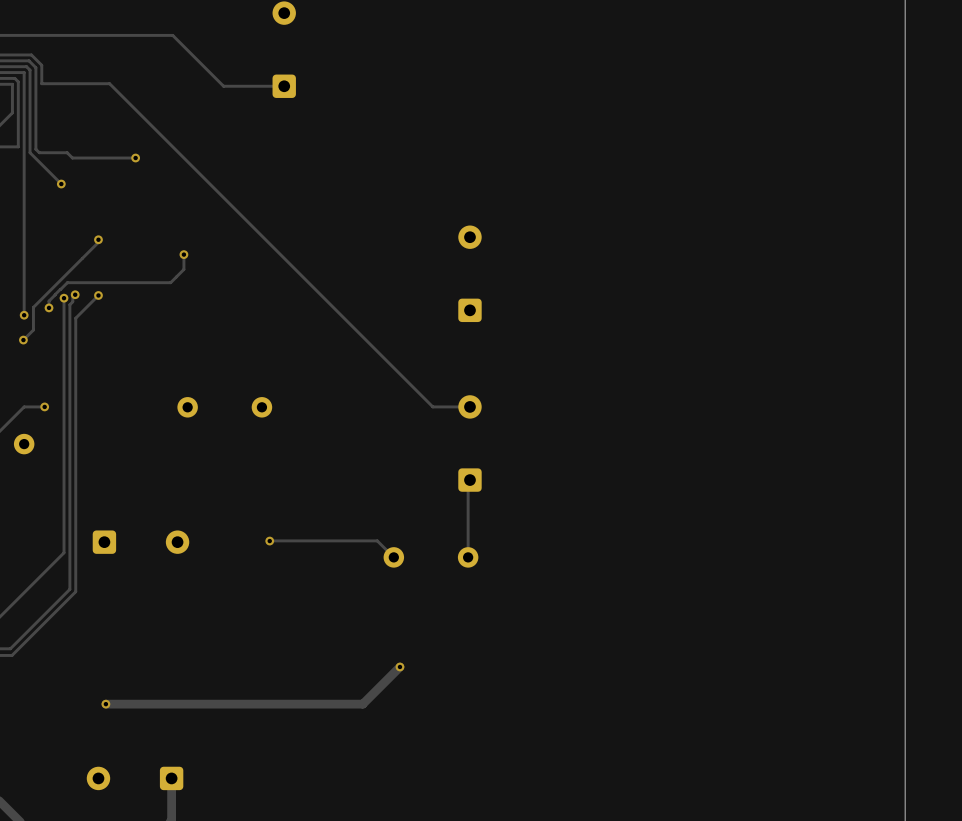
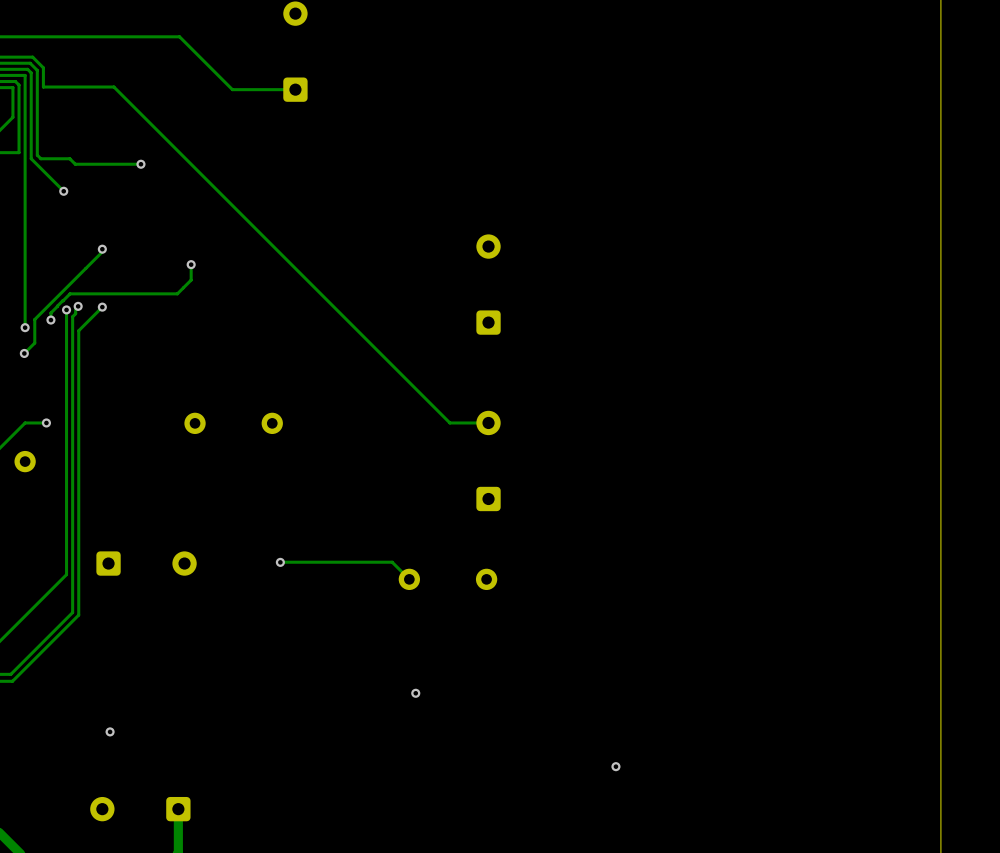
track: (468, 481) (468, 557) -> none
track: (399, 666) (362, 704) (105, 704) -> none
via: none -> (615, 766)

